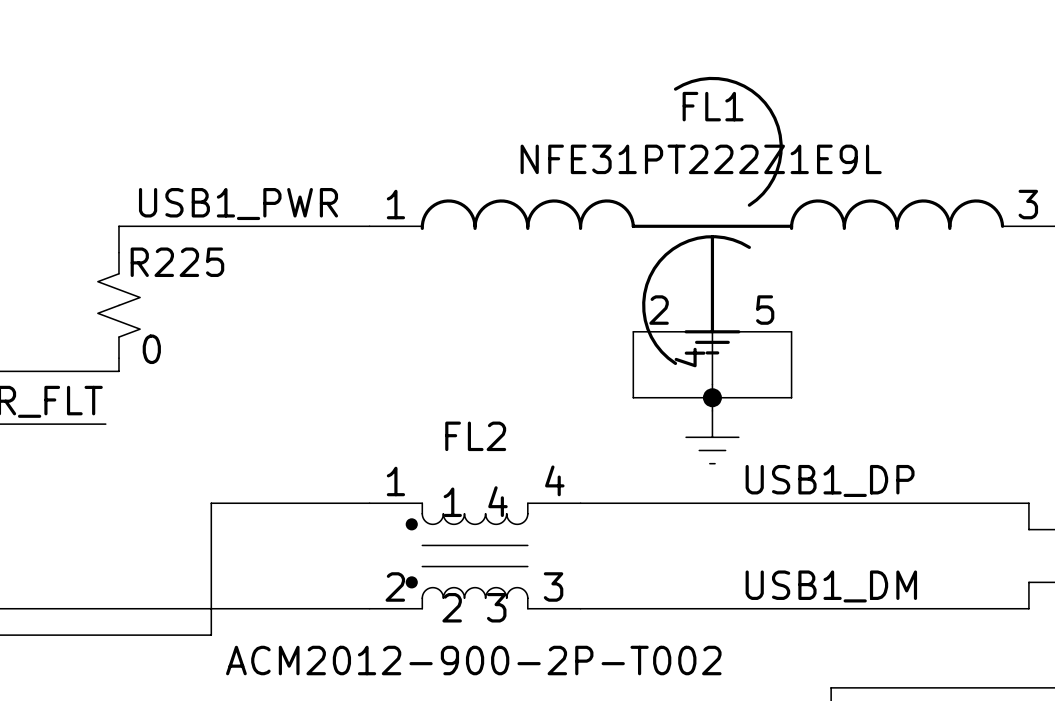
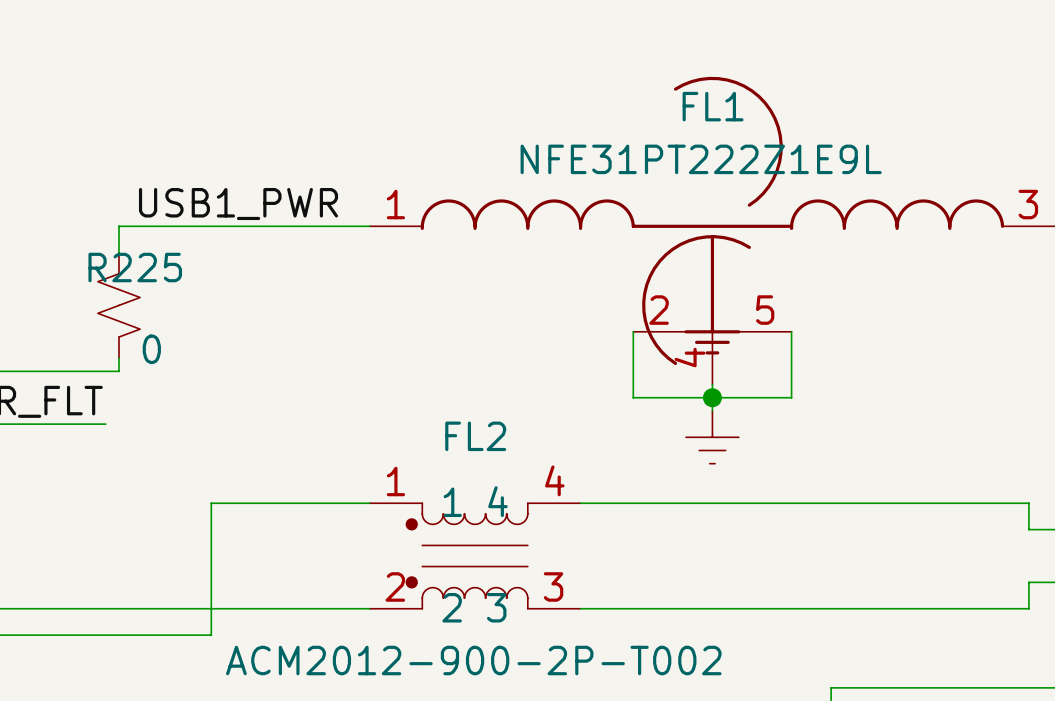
R225 name position: R225 (177, 262) -> R225 (135, 267)
label: USB1_DP (830, 480) -> none
label: USB1_DM (831, 586) -> none

